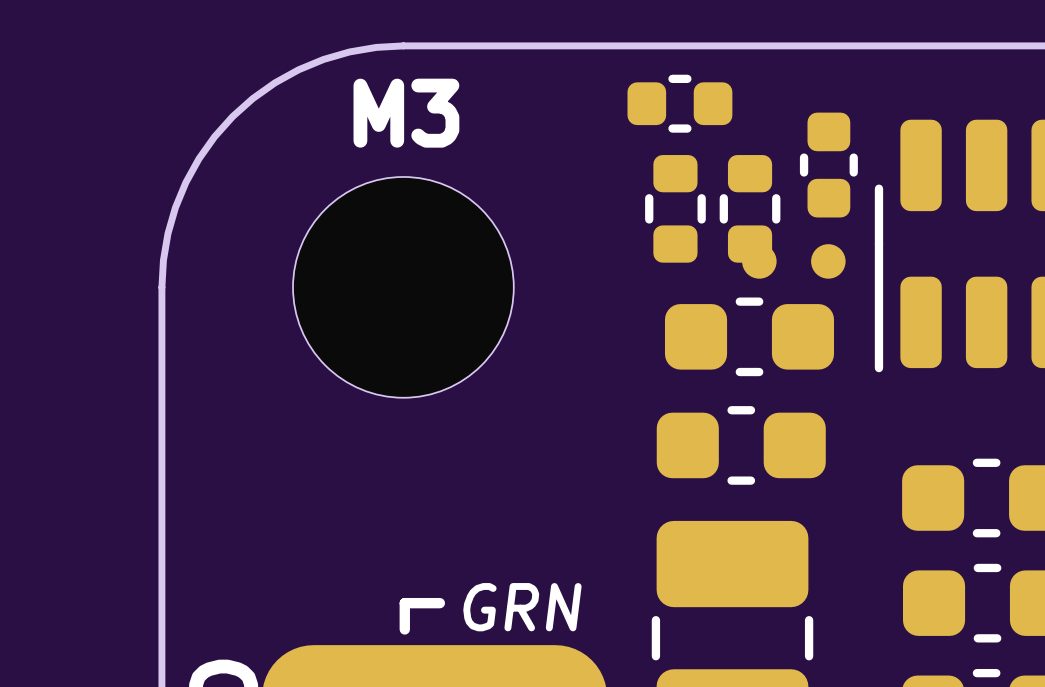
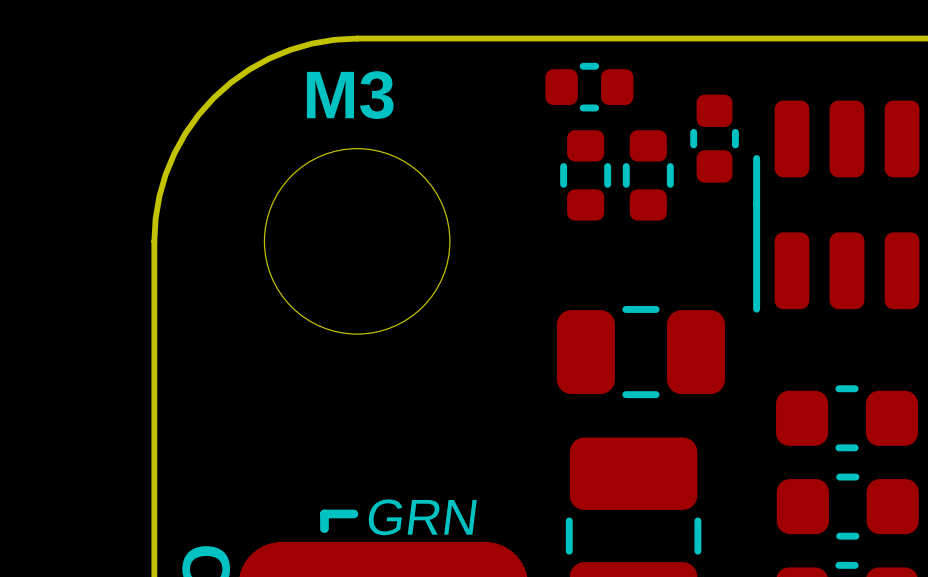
part: (793, 261) -> none
part: (749, 336) -> none
part footprint: [656, 406, 826, 485] -> [556, 305, 725, 399]
line: (439, 603) (404, 603) (404, 629) -> none
text position: GRN (522, 607) -> GRN (422, 517)
line: none -> (353, 513) (324, 513) (324, 528)

